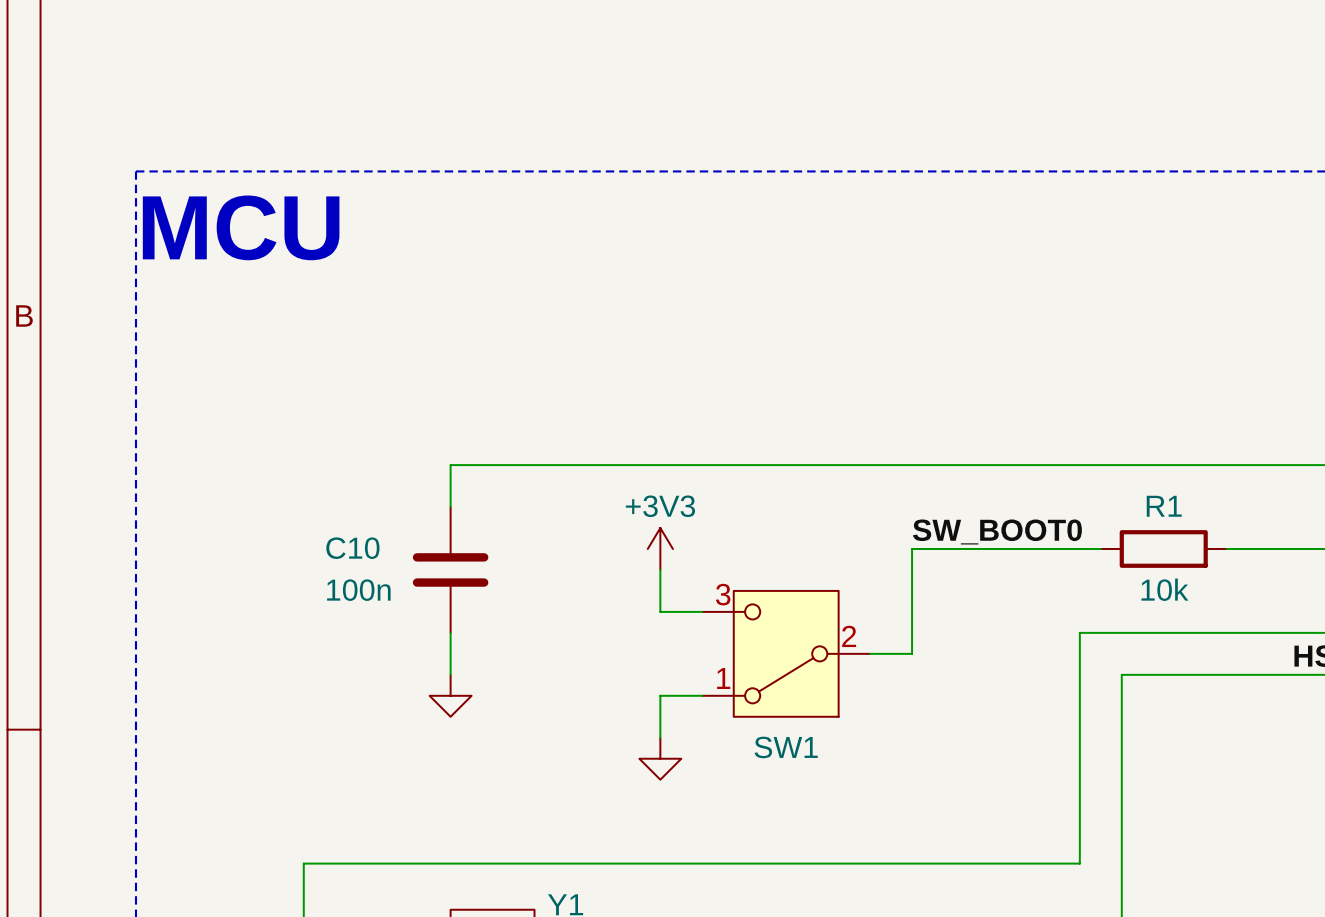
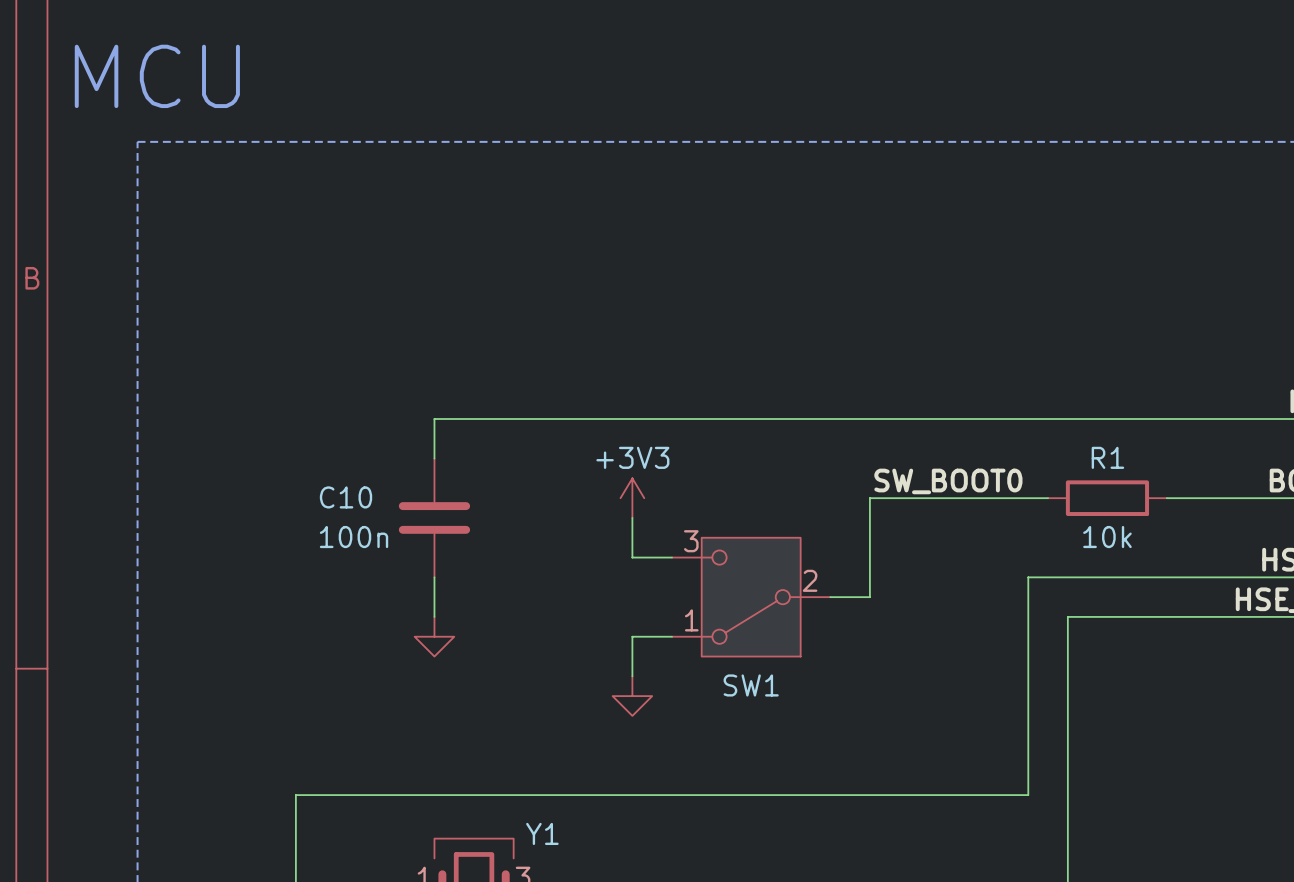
text position: MCU (241, 227) -> MCU (157, 76)

